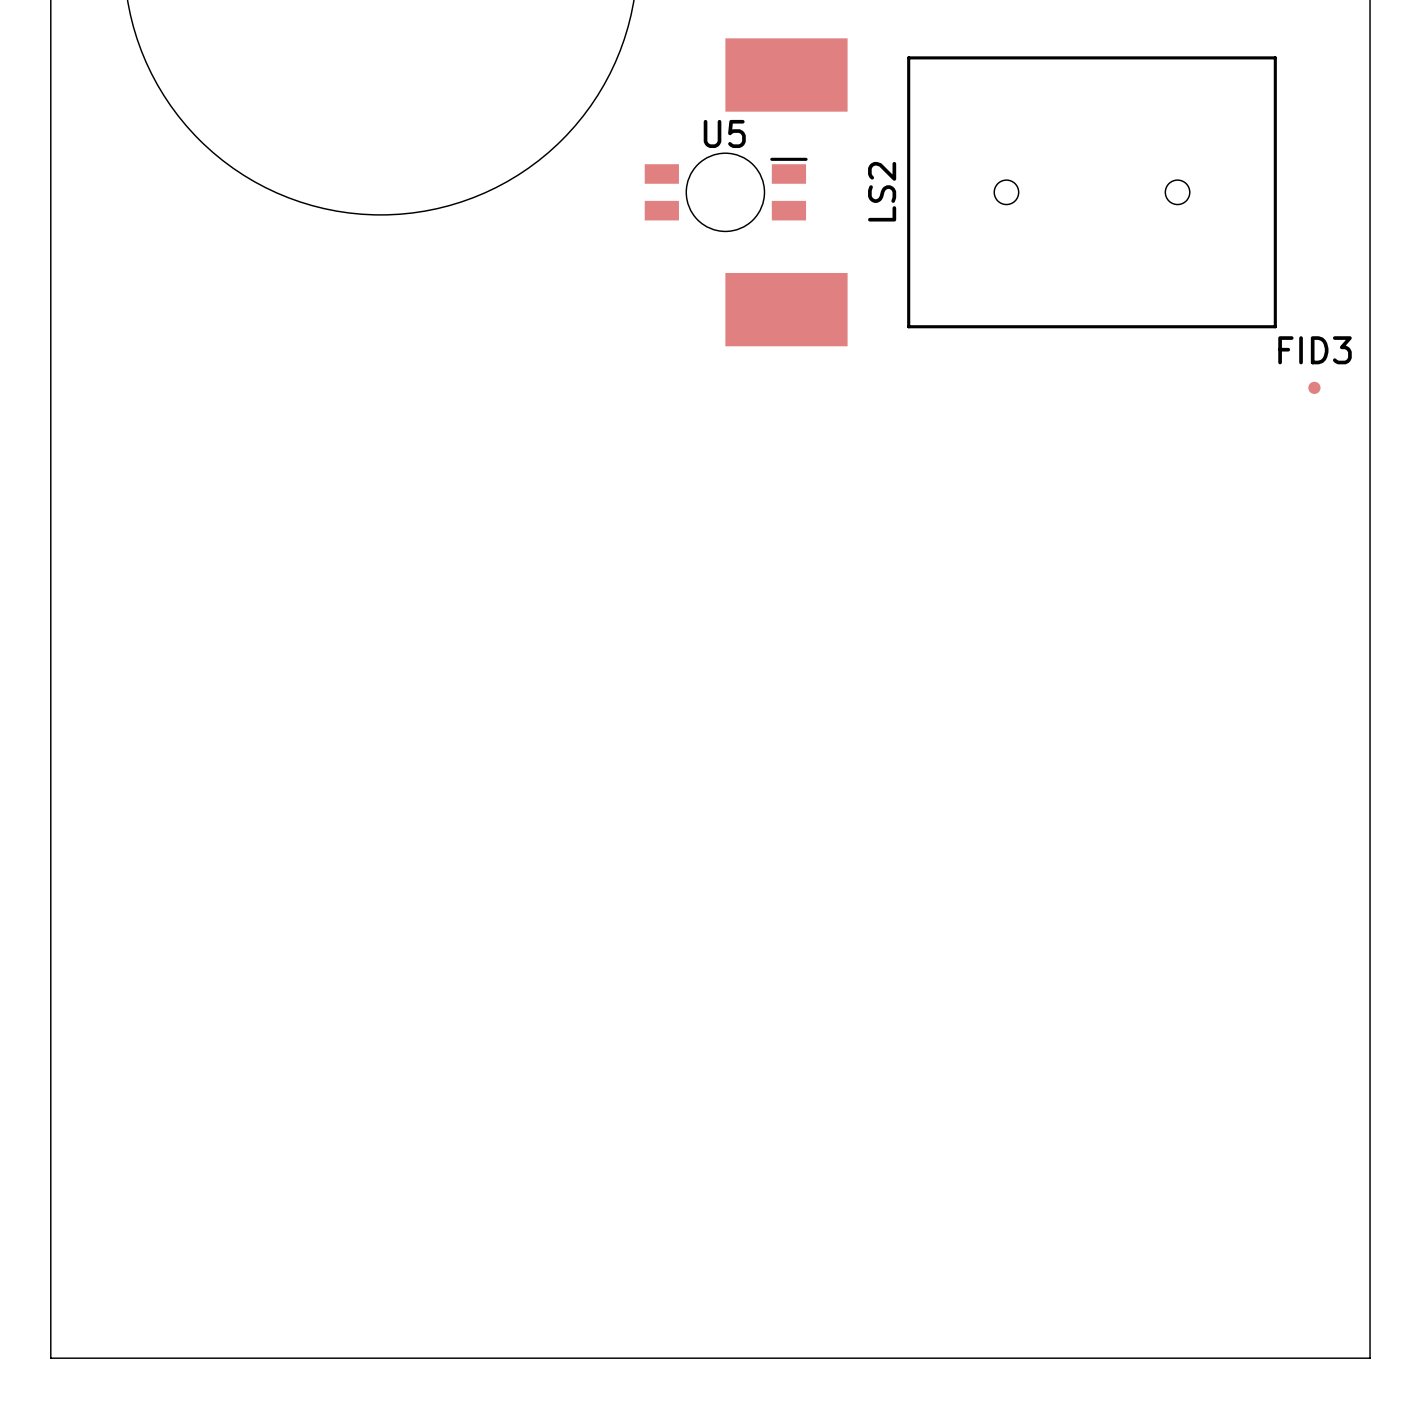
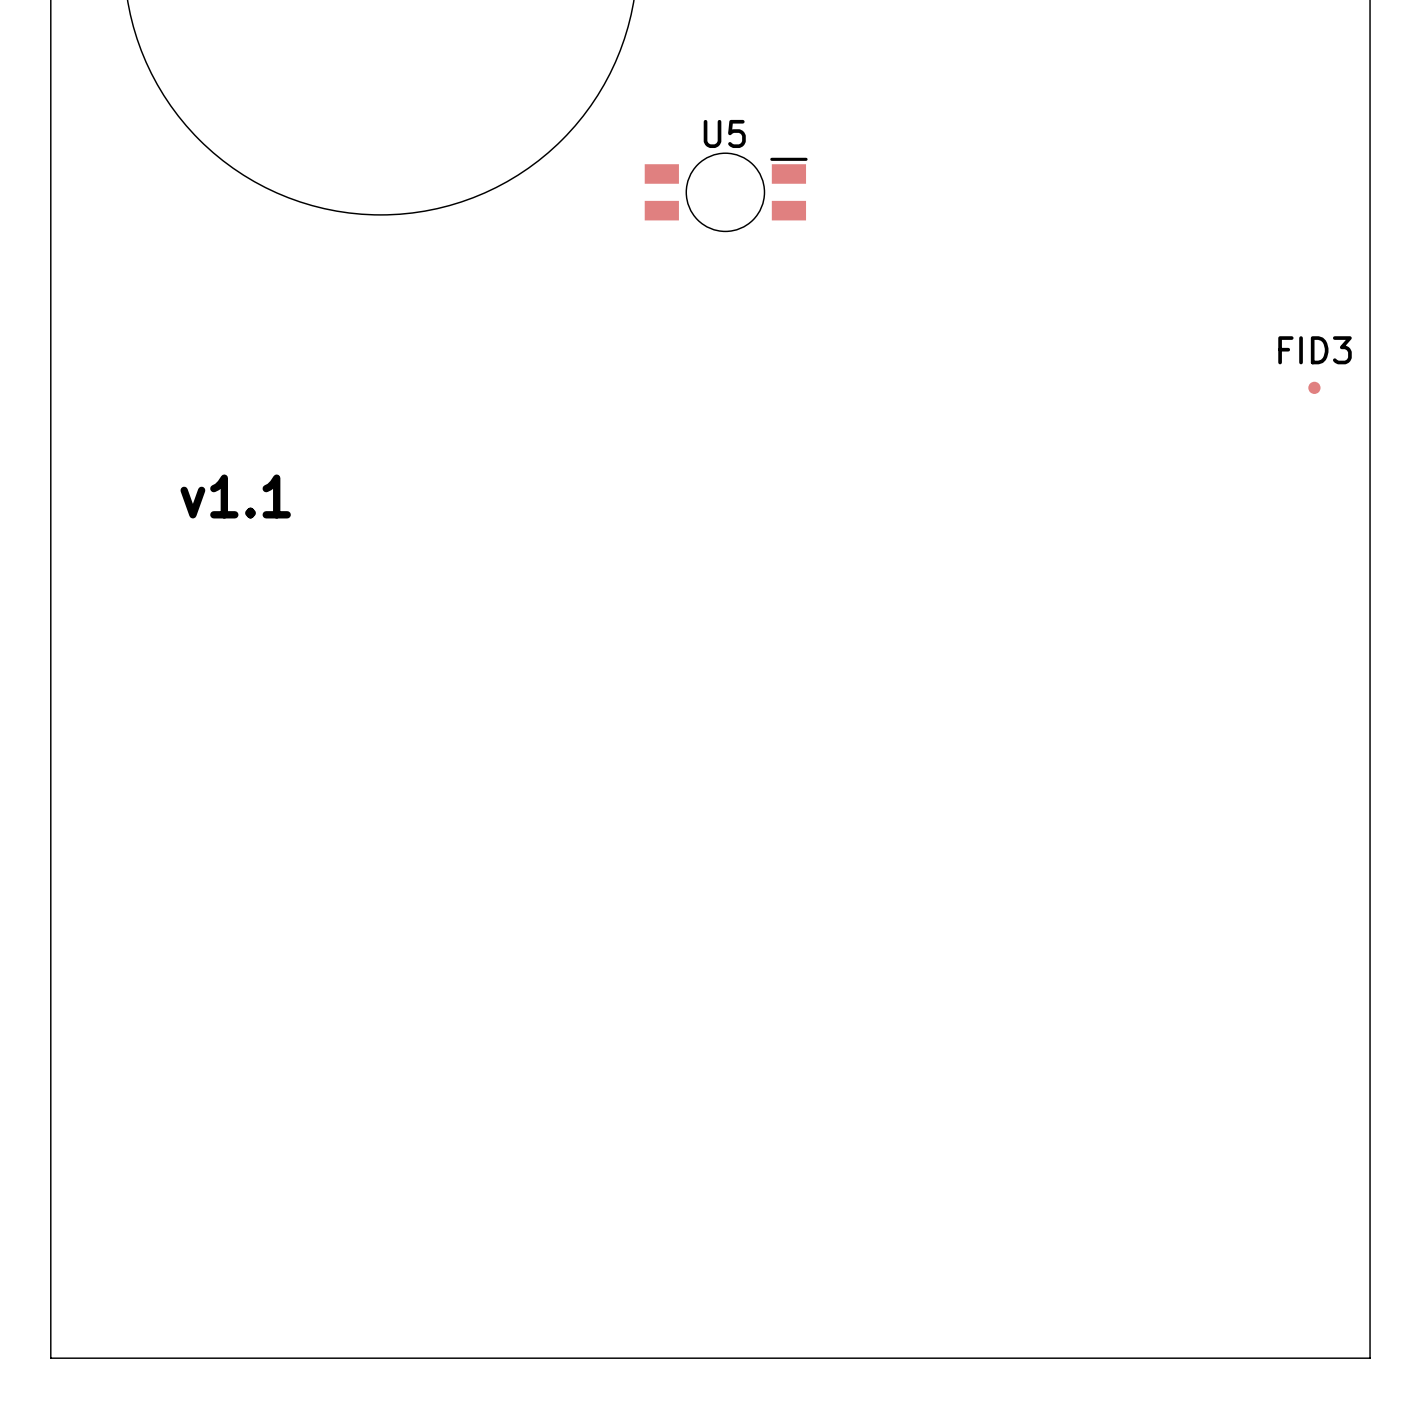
LS2: (1001, 192) -> none
text: none -> v1.1 (235, 496)

